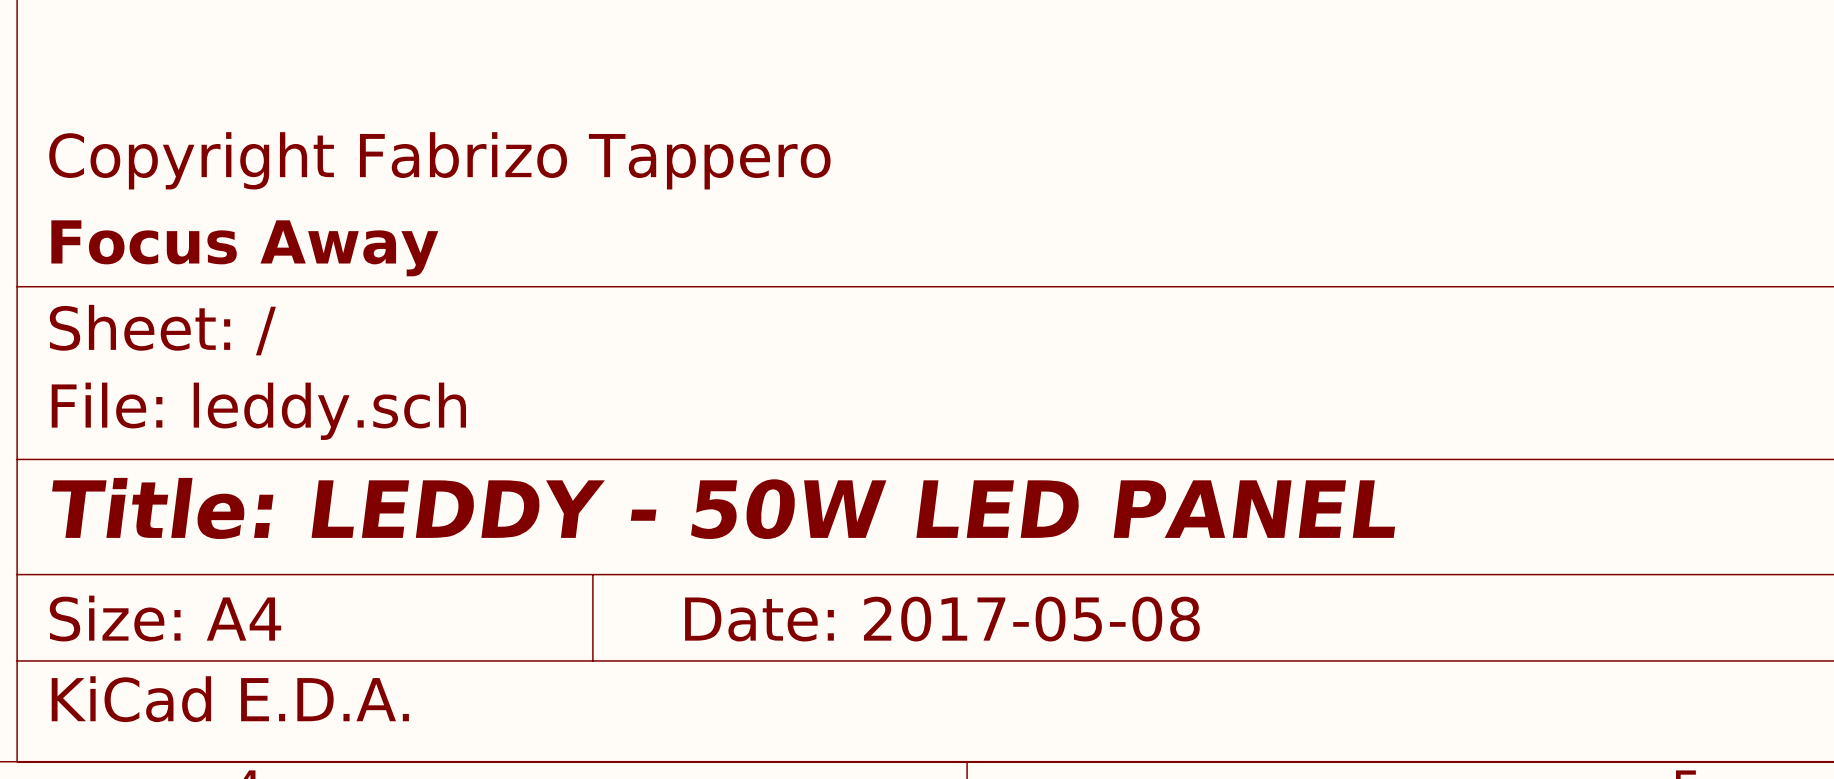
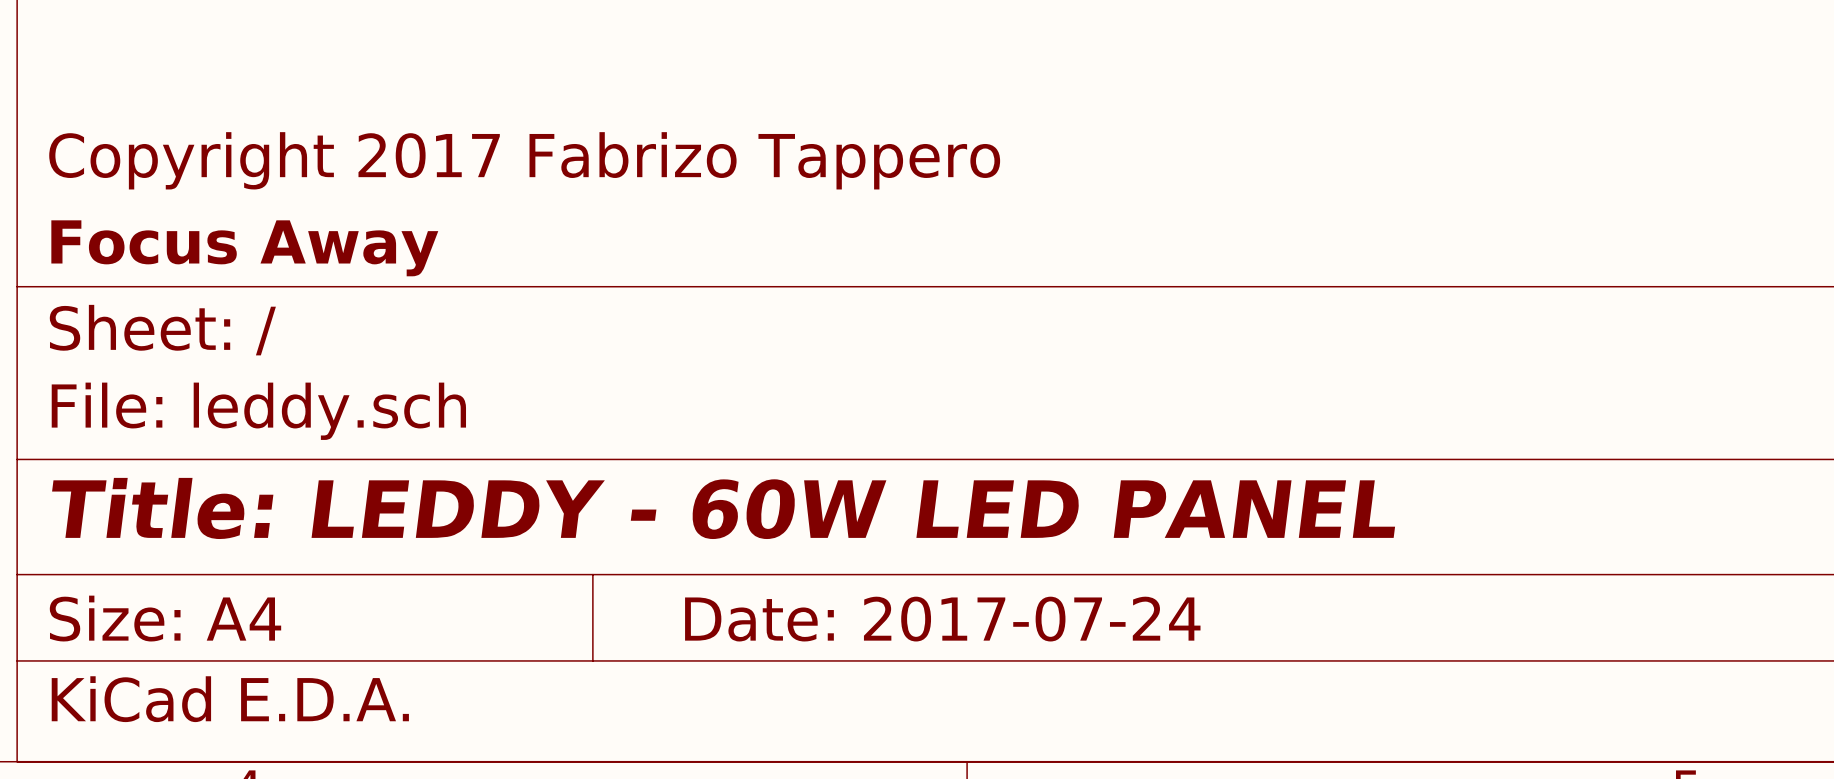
title block: Copyright Fabrizo Tappero (439, 160) -> Copyright 2017 Fabrizo Tappero (524, 160)
title block: Title: LEDDY - 50W LED PANEL (723, 508) -> Title: LEDDY - 60W LED PANEL (723, 508)
title block: Date: 2017-05-08 (942, 619) -> Date: 2017-07-24 (942, 619)

